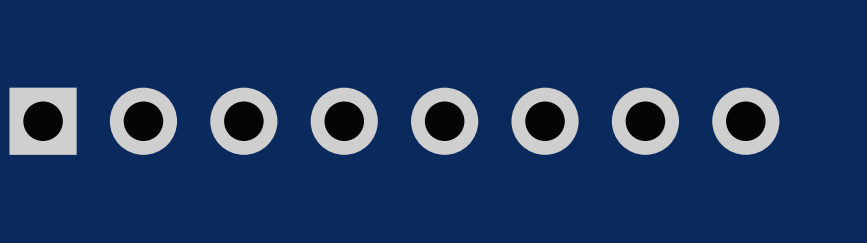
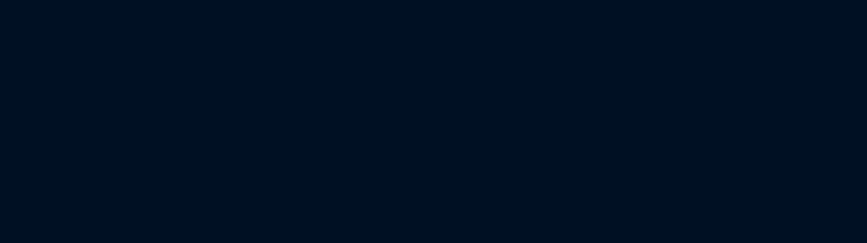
part: (394, 121) -> none

